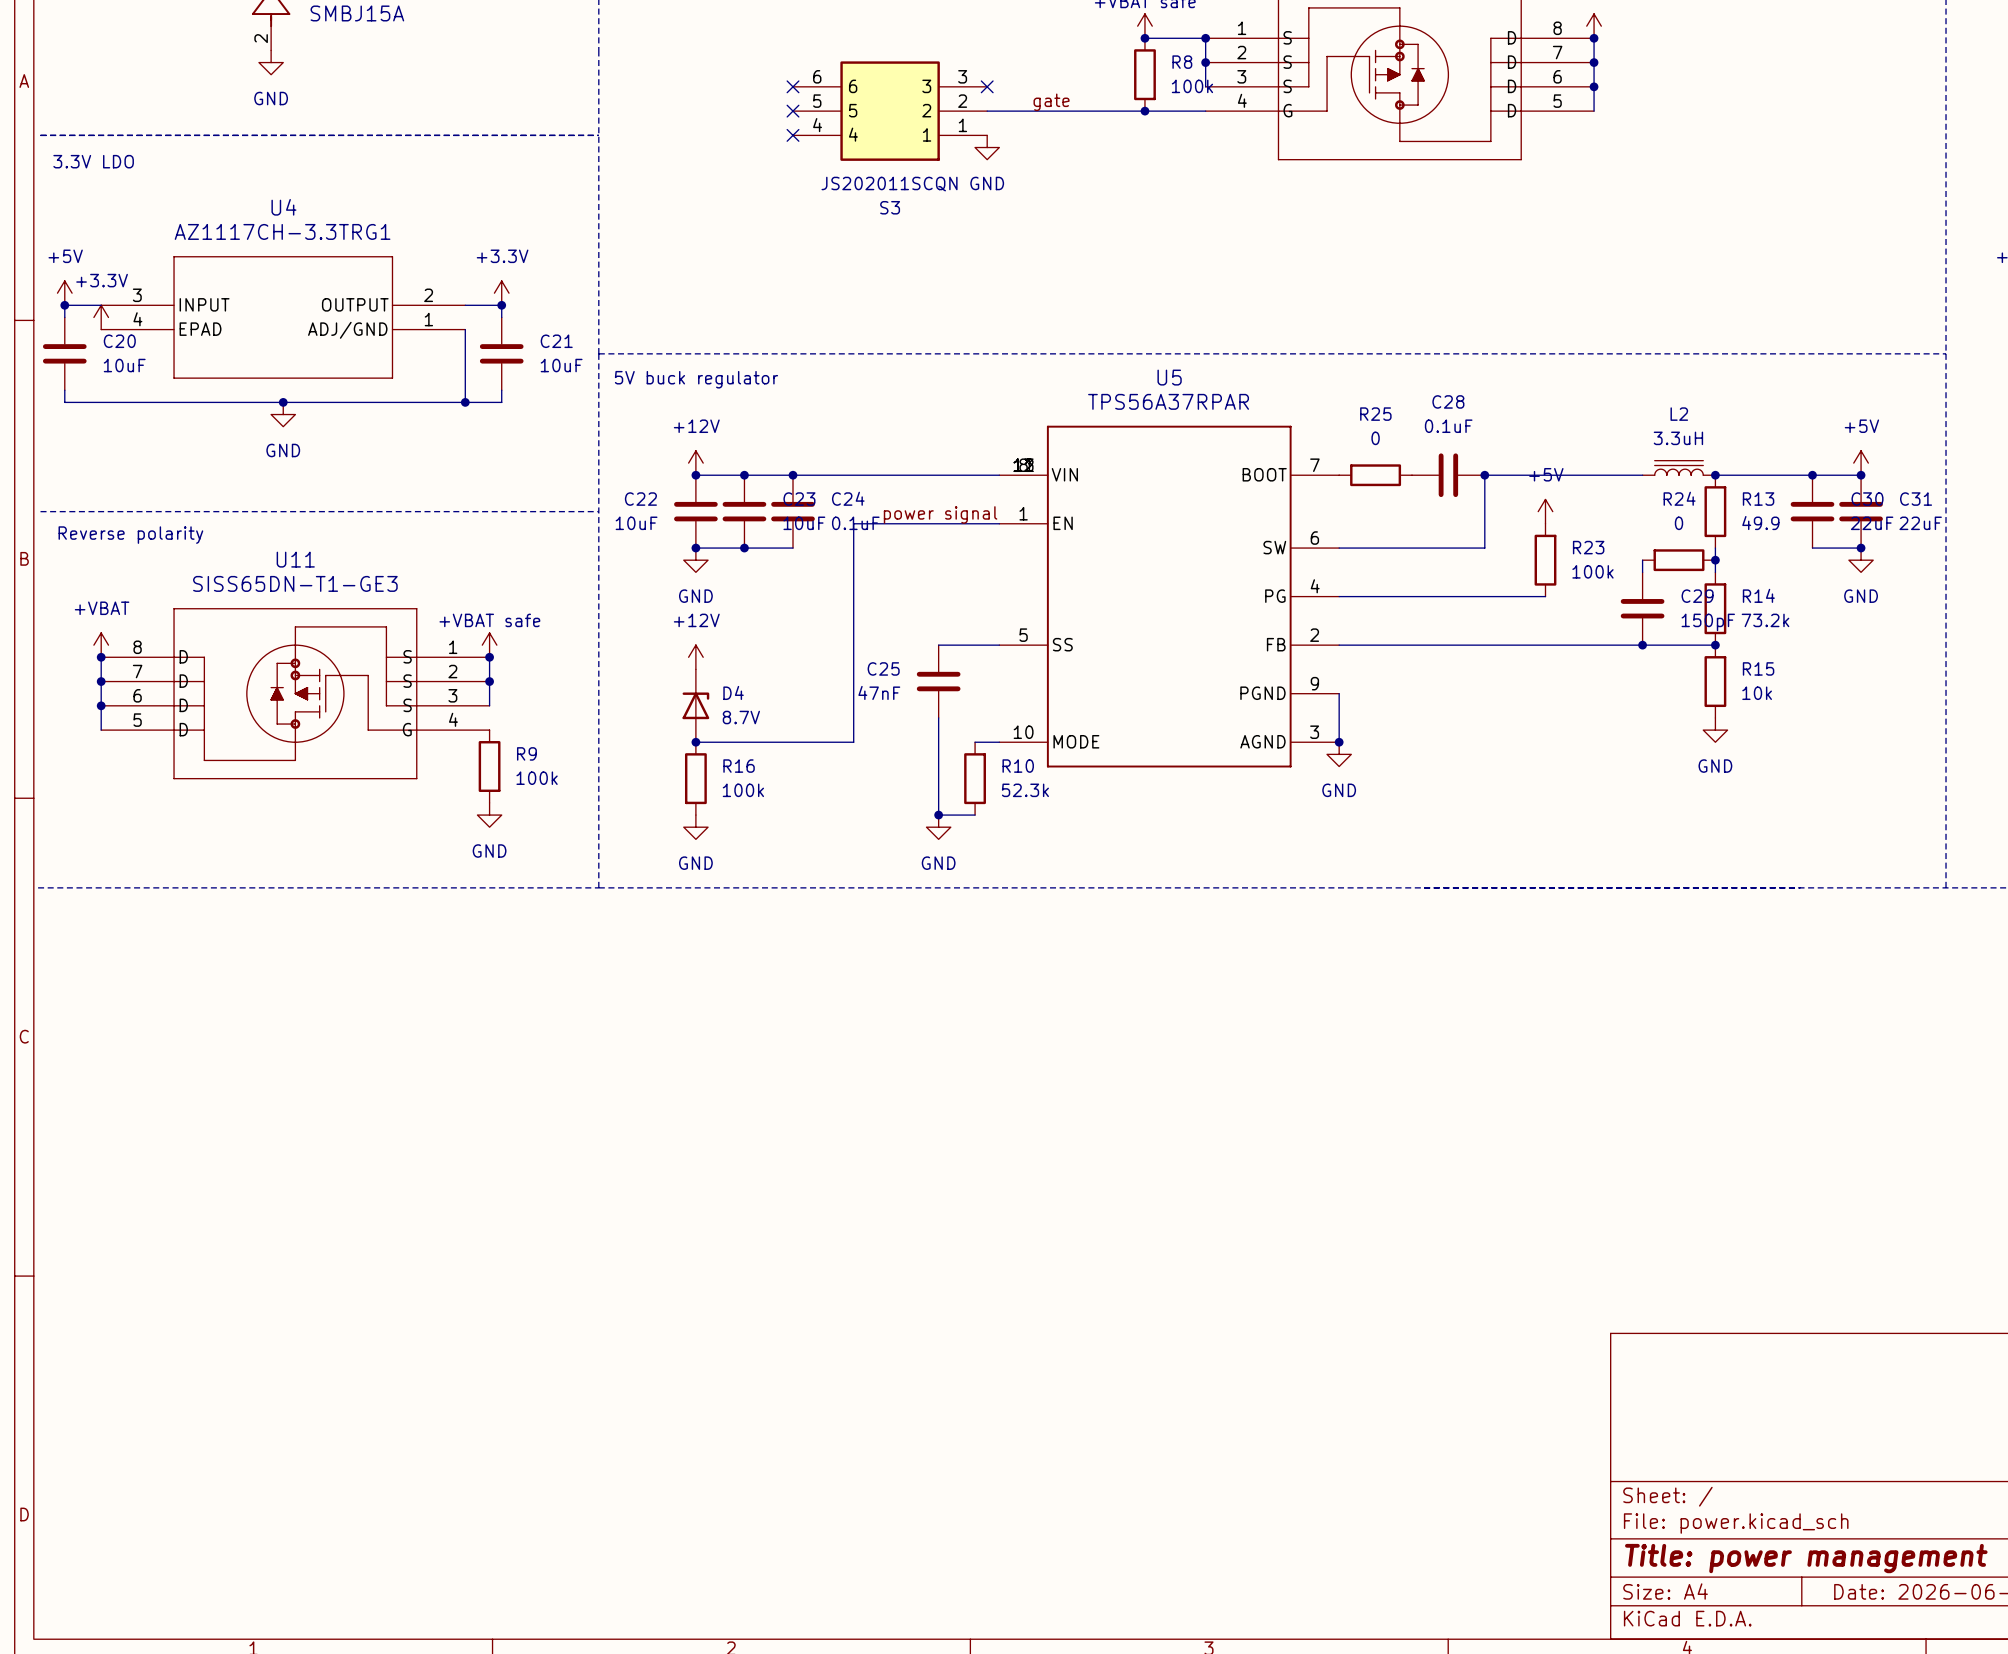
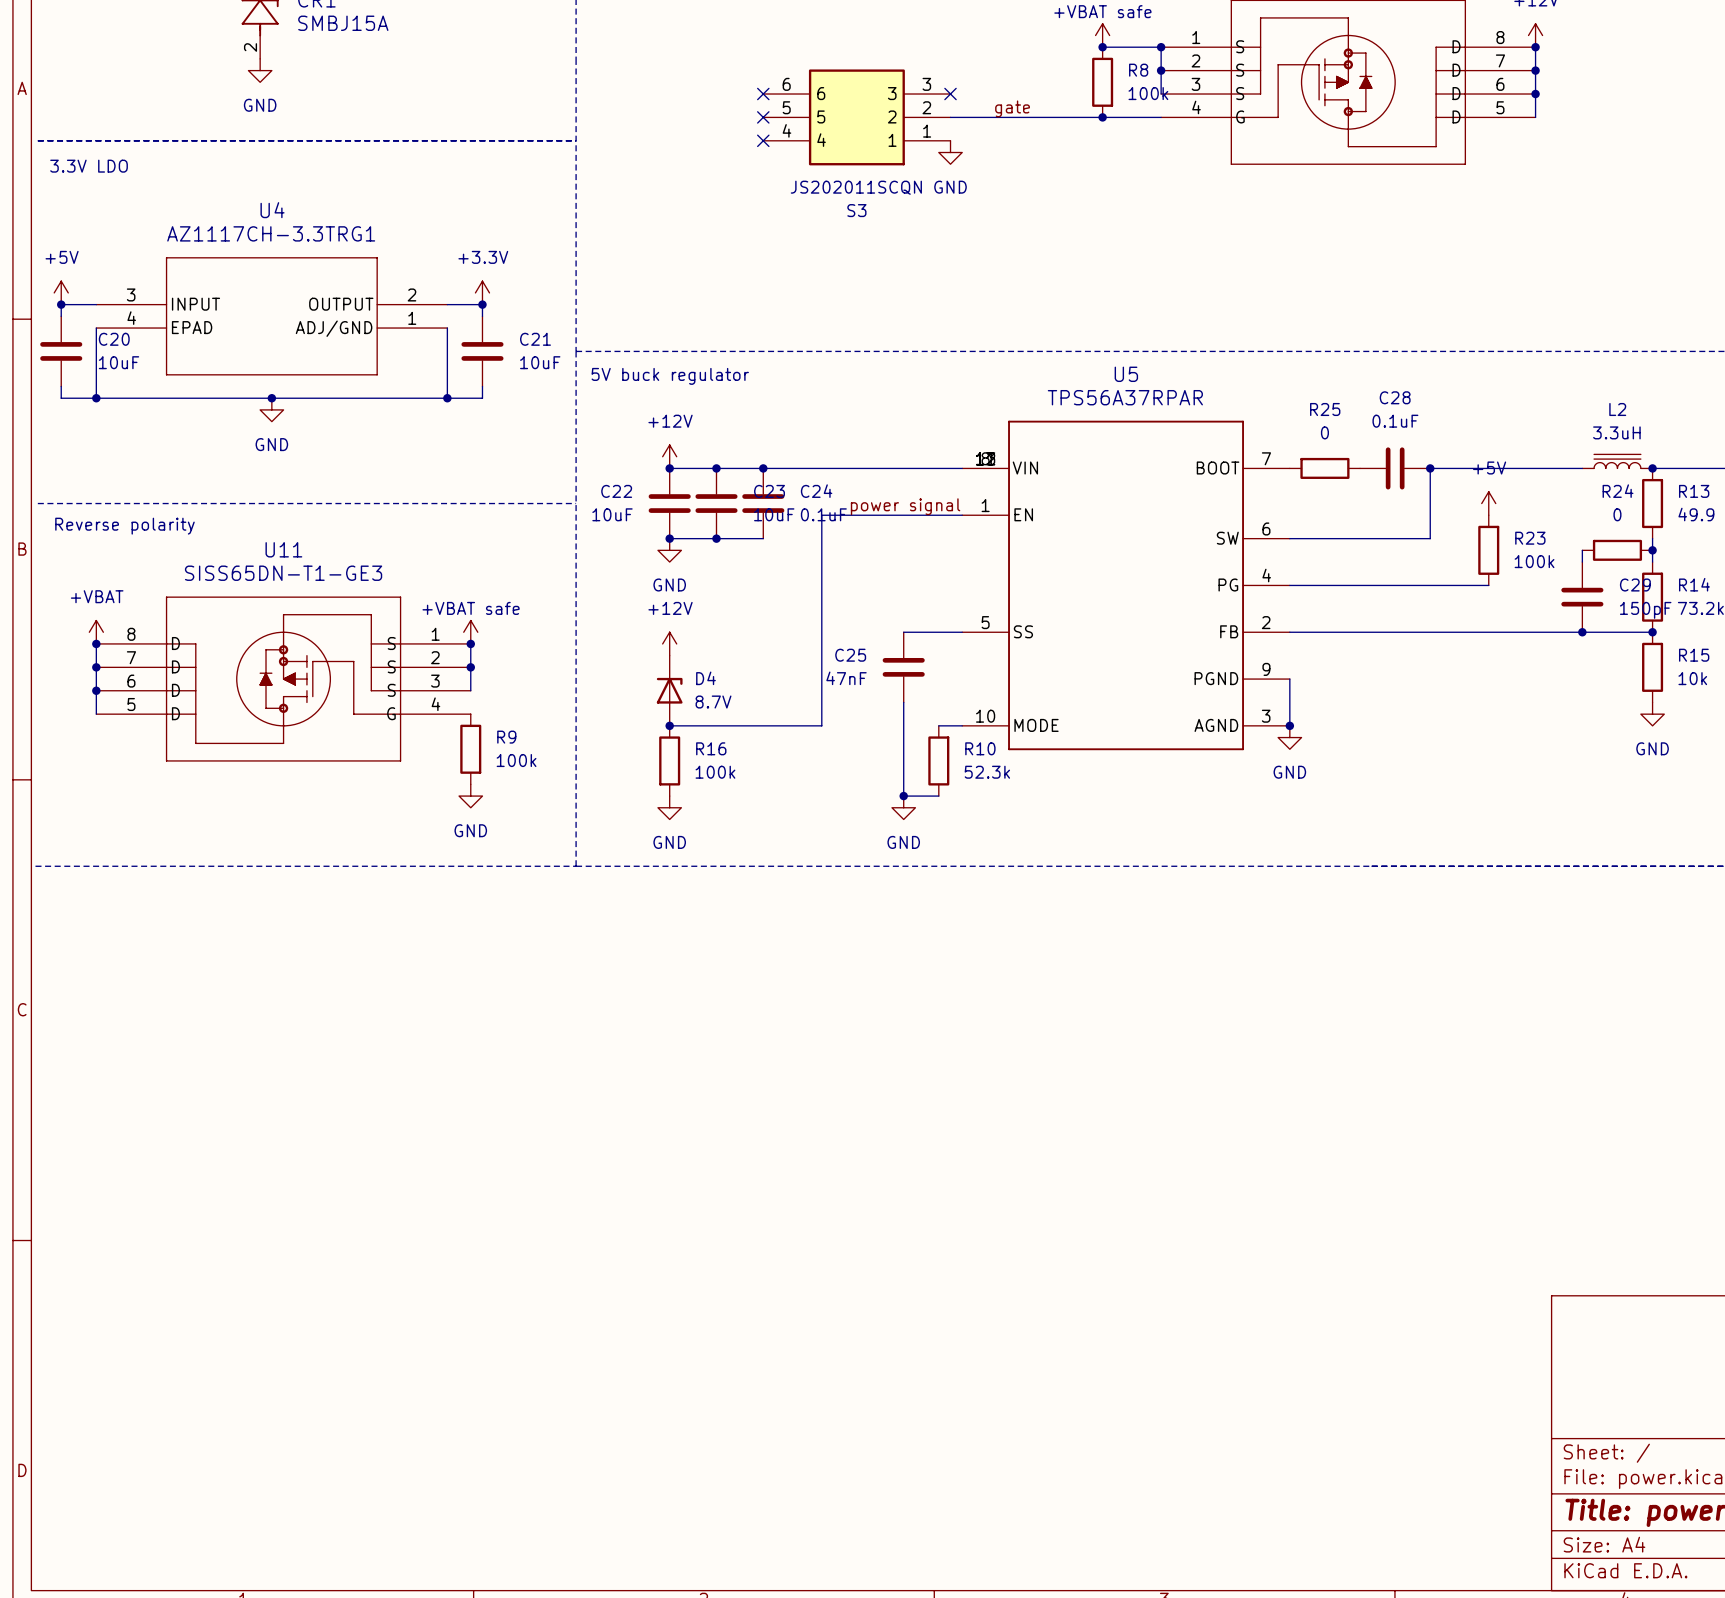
power symbol: +3.3V (101, 317) -> none
wire: none -> (96, 328) (96, 398)
junction: none -> (96, 398)

